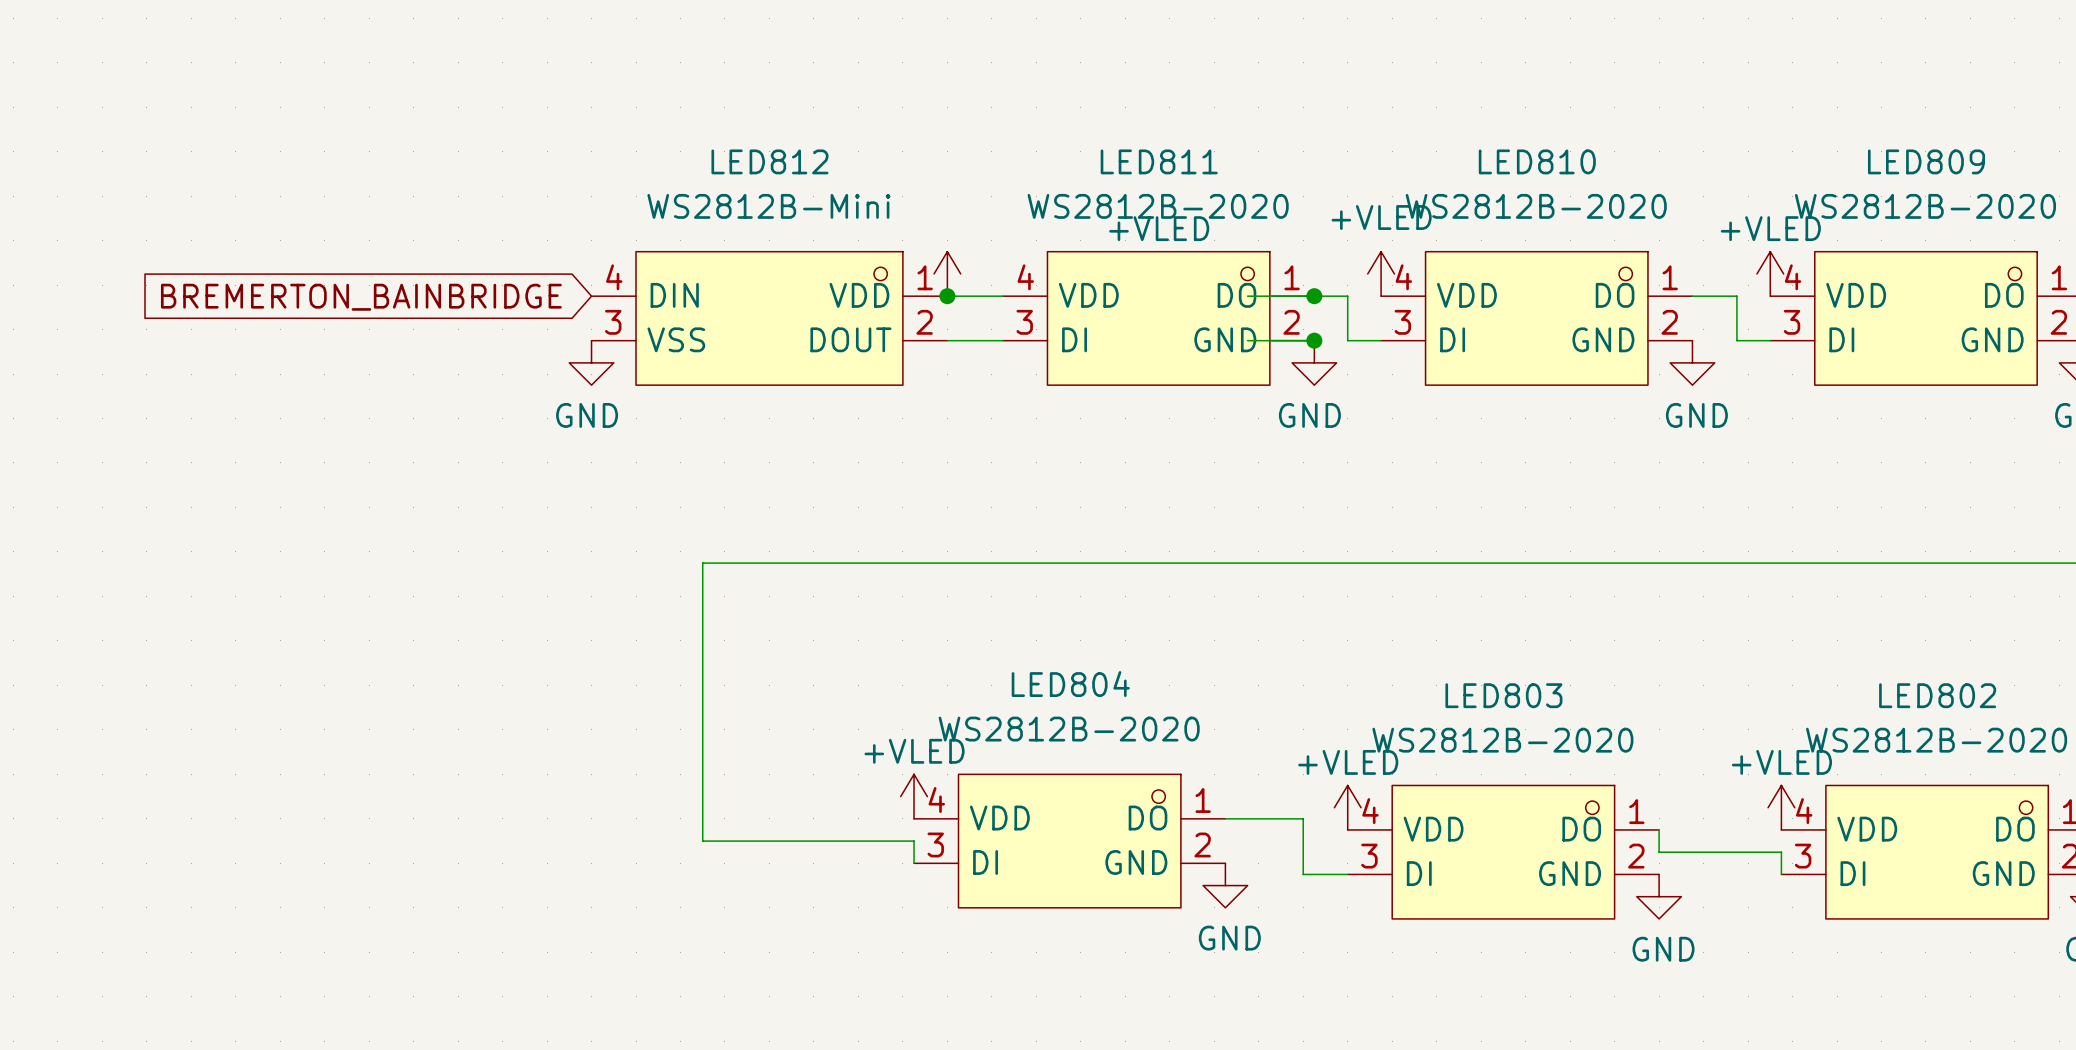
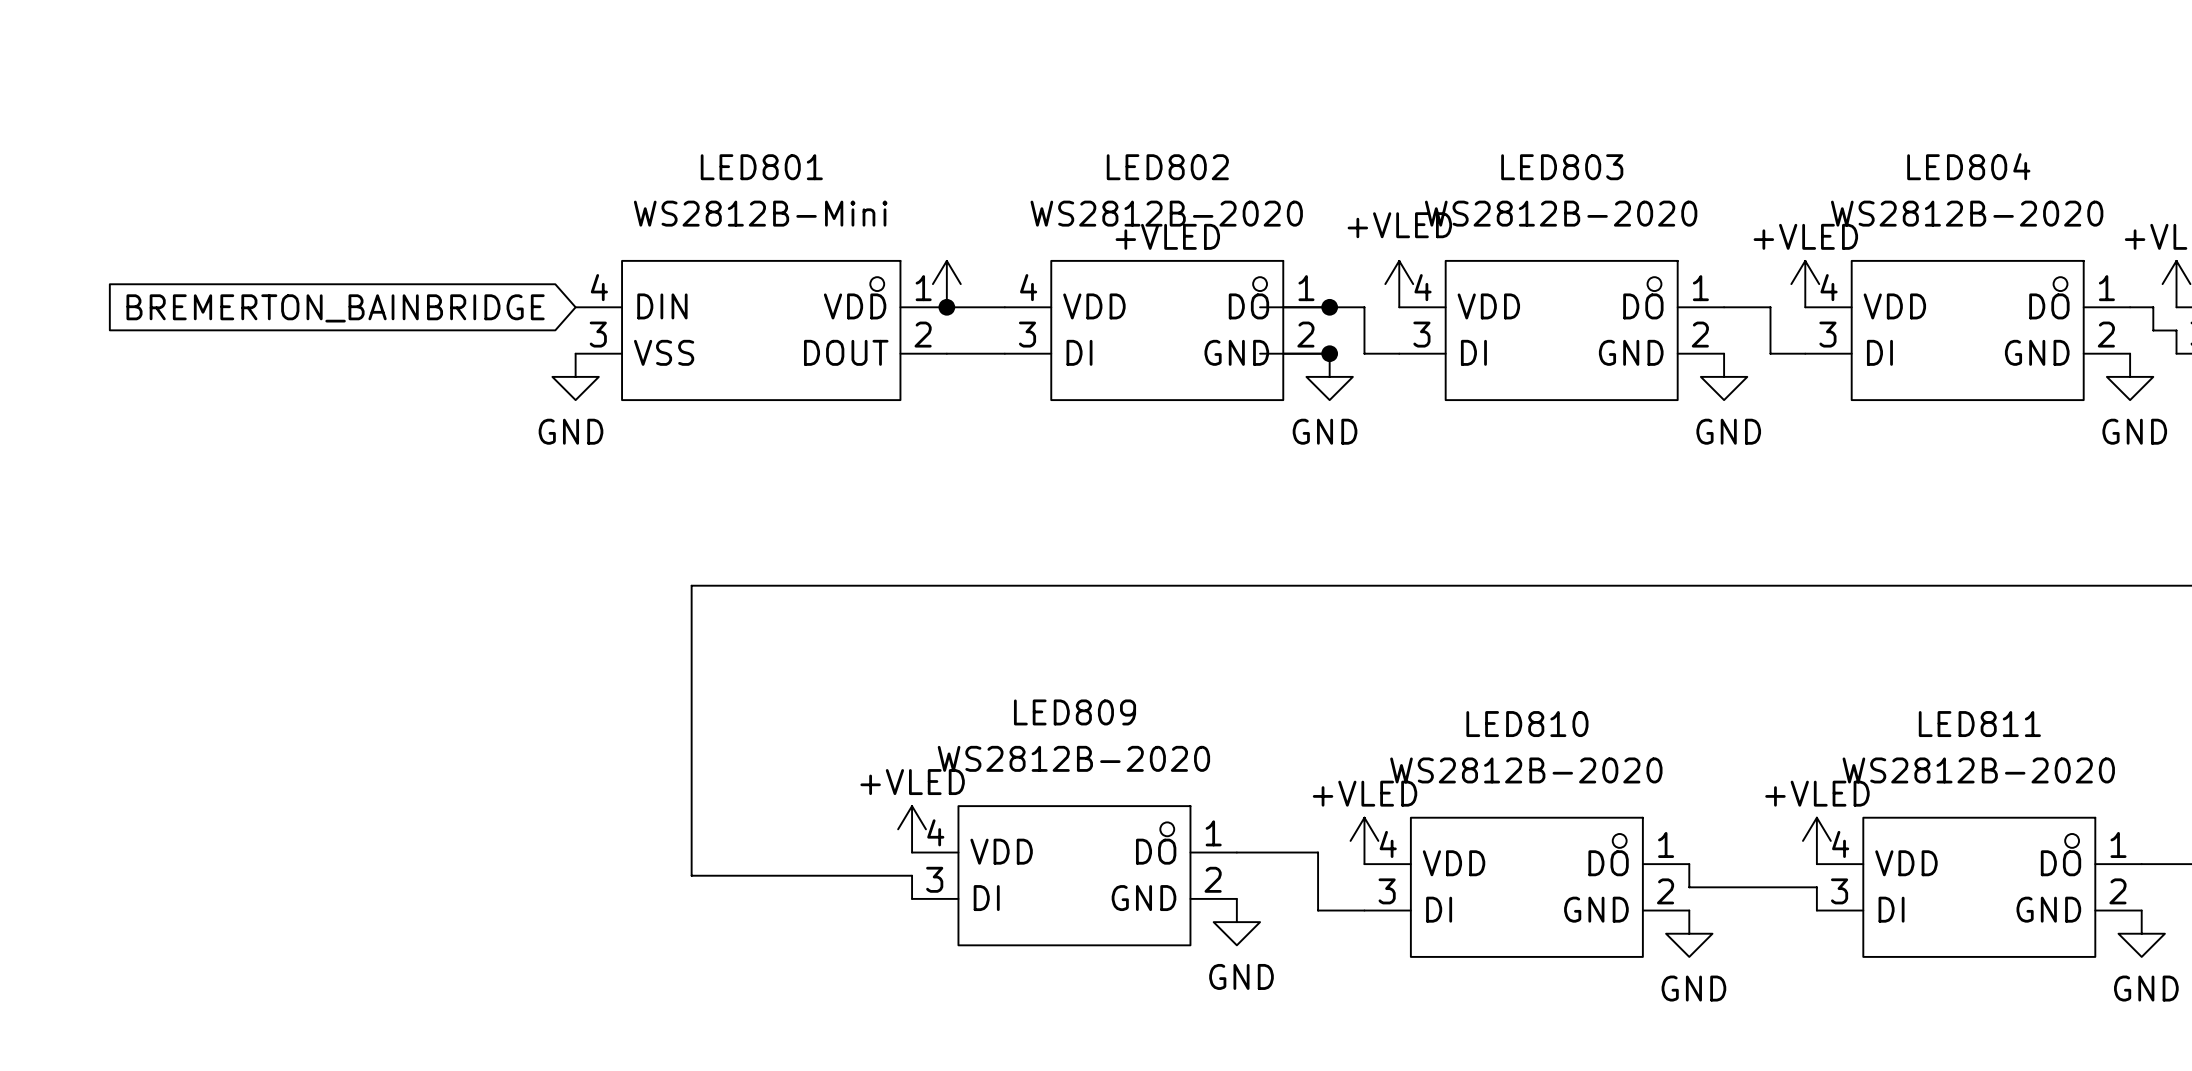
LED812 name: LED812 (769, 161) -> LED801 (761, 167)
LED811 name: LED811 (1159, 161) -> LED802 (1167, 167)
LED810 name: LED810 (1537, 161) -> LED803 (1562, 167)
LED809 name: LED809 (1926, 161) -> LED804 (1968, 166)
LED804 name: LED804 (1070, 684) -> LED809 (1075, 712)
LED803 name: LED803 (1503, 695) -> LED810 (1527, 724)
LED802 name: LED802 (1937, 695) -> LED811 (1979, 724)

